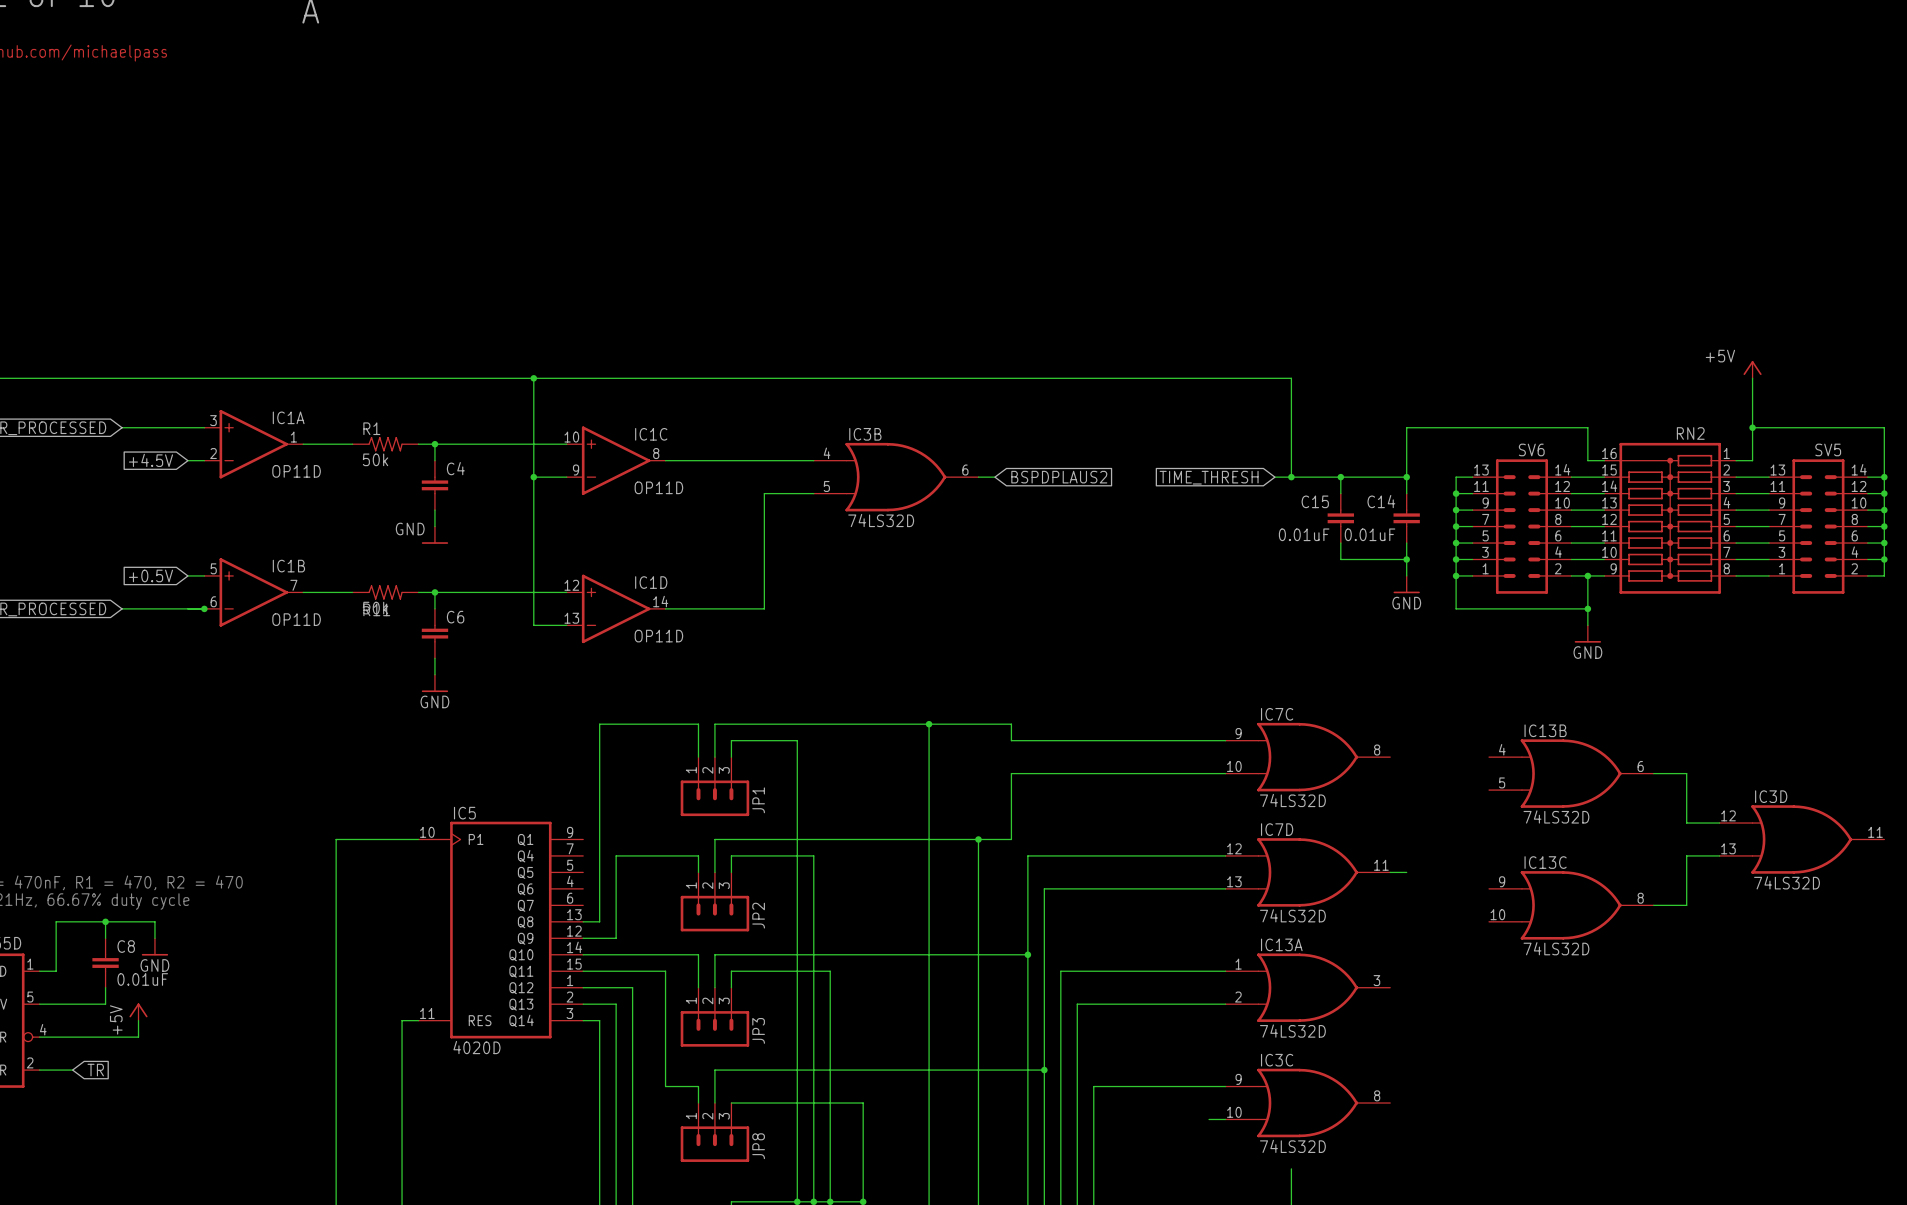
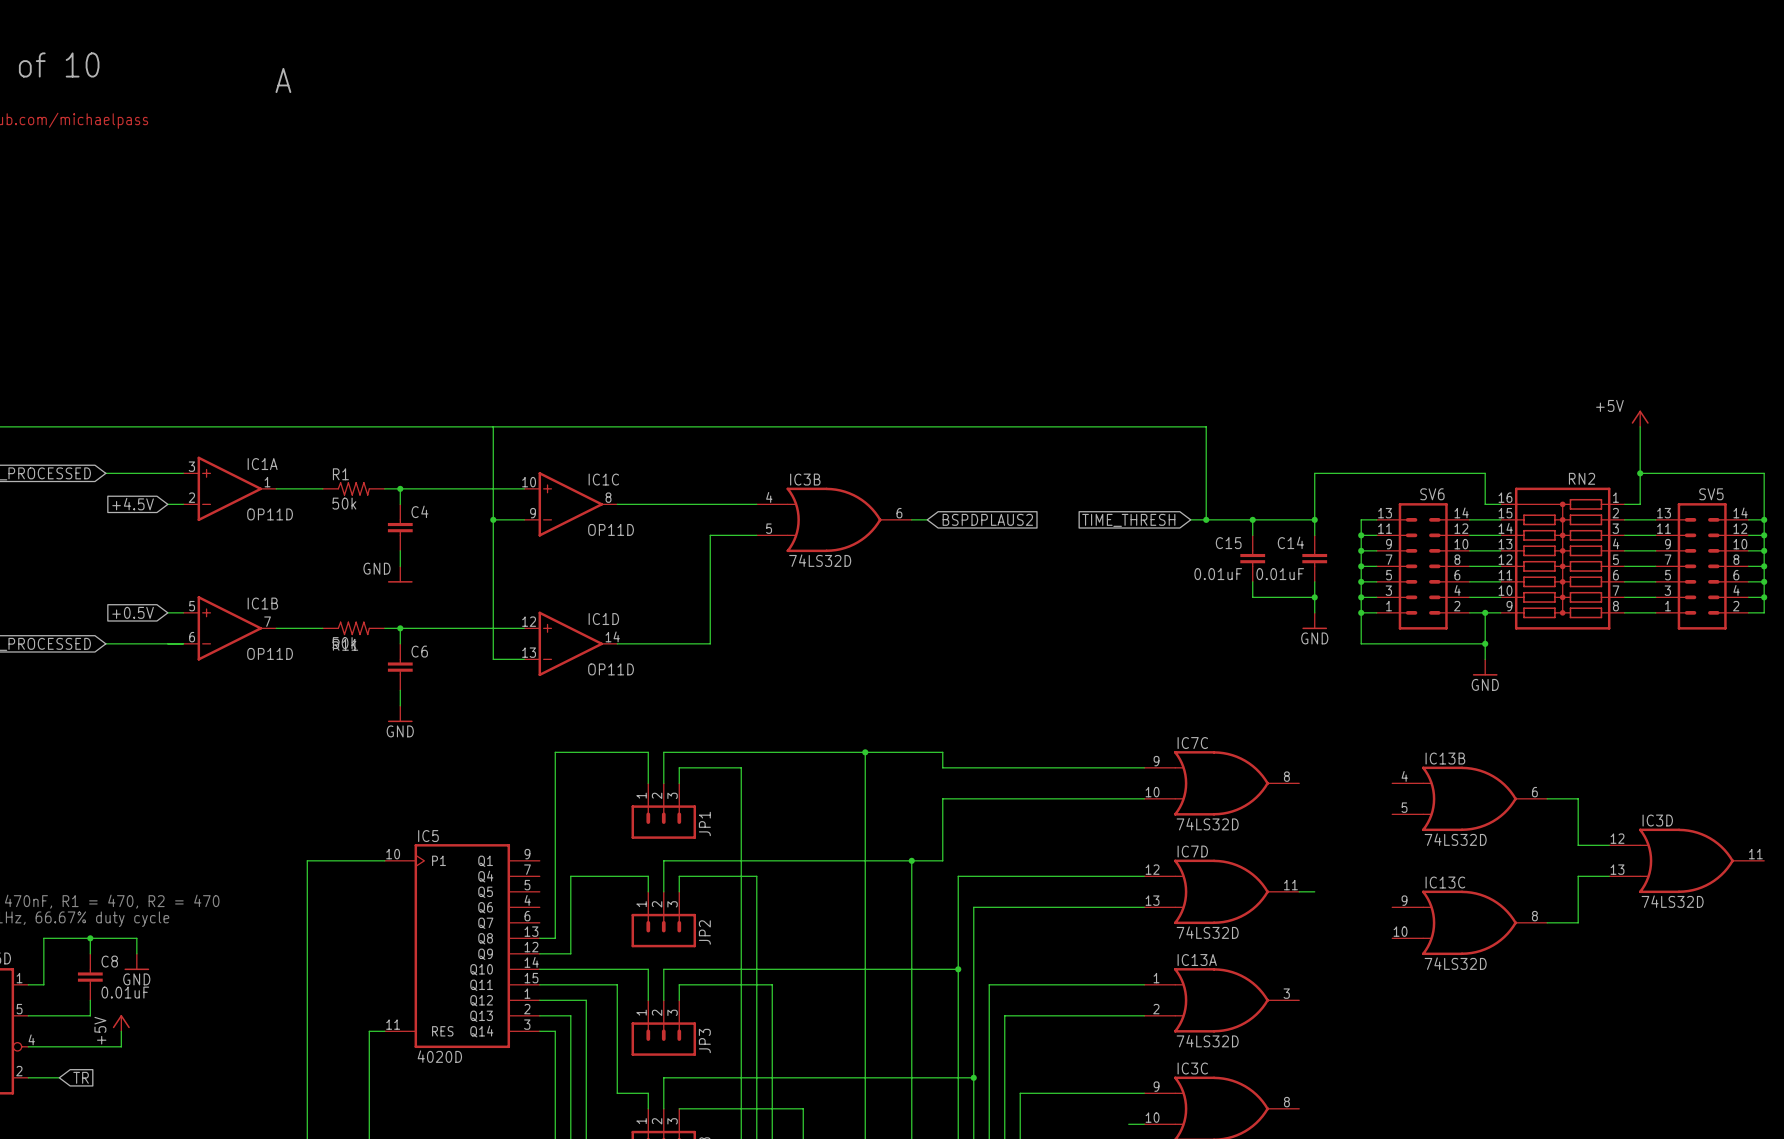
junction: (533, 378) -> none
junction: (204, 608) -> none

